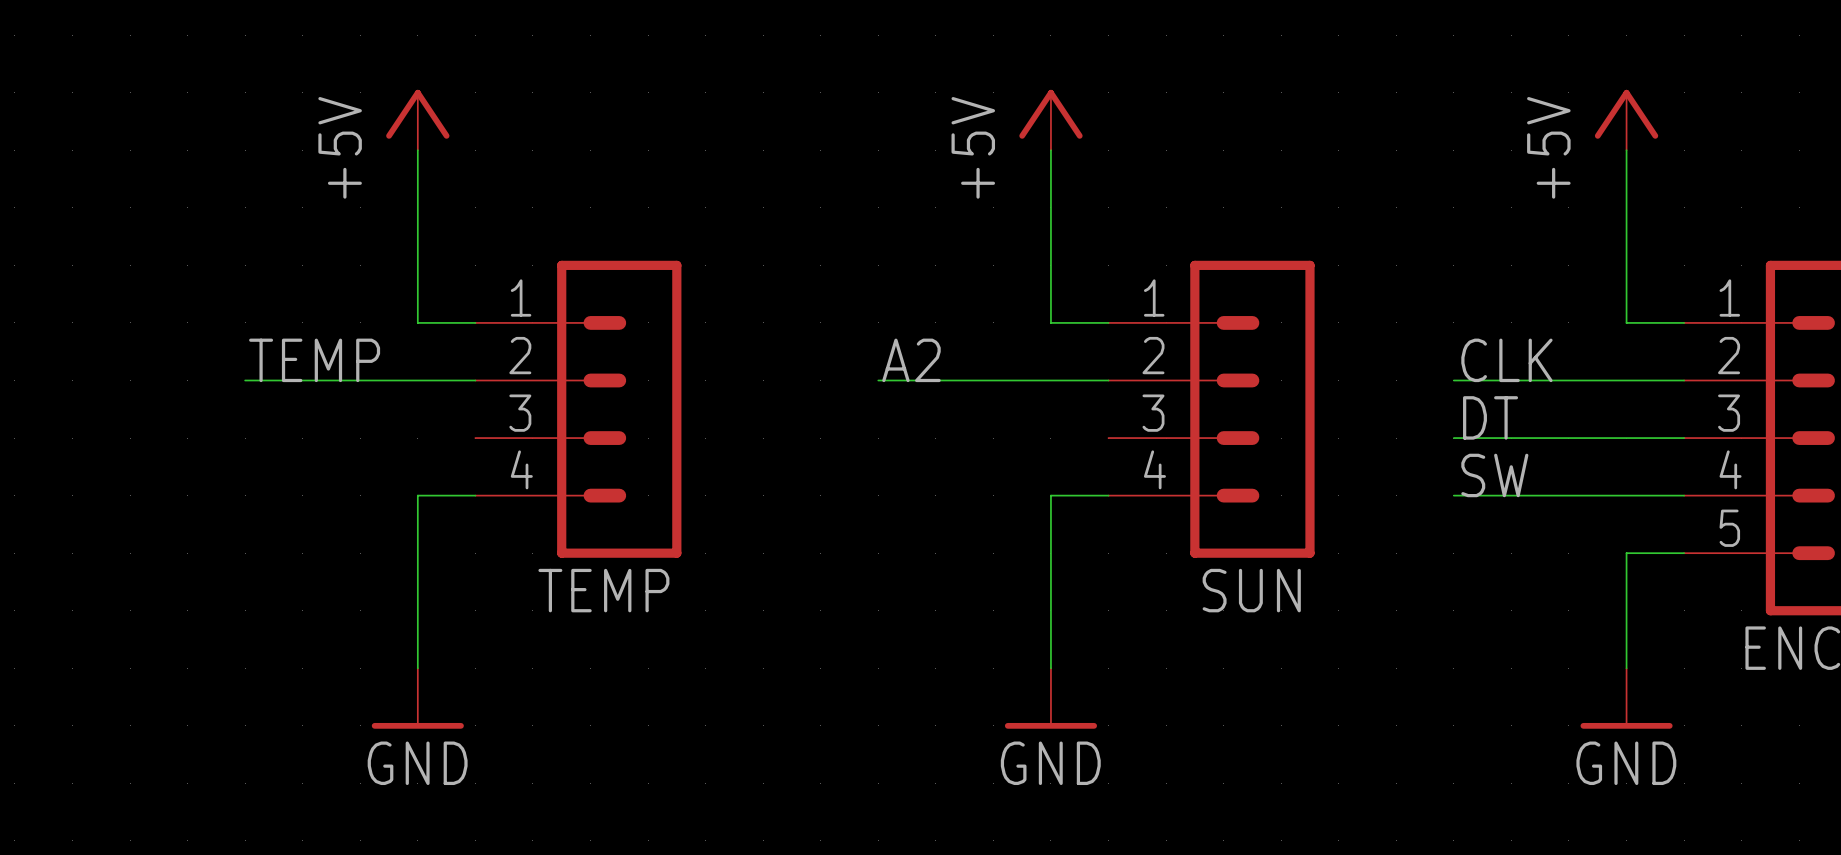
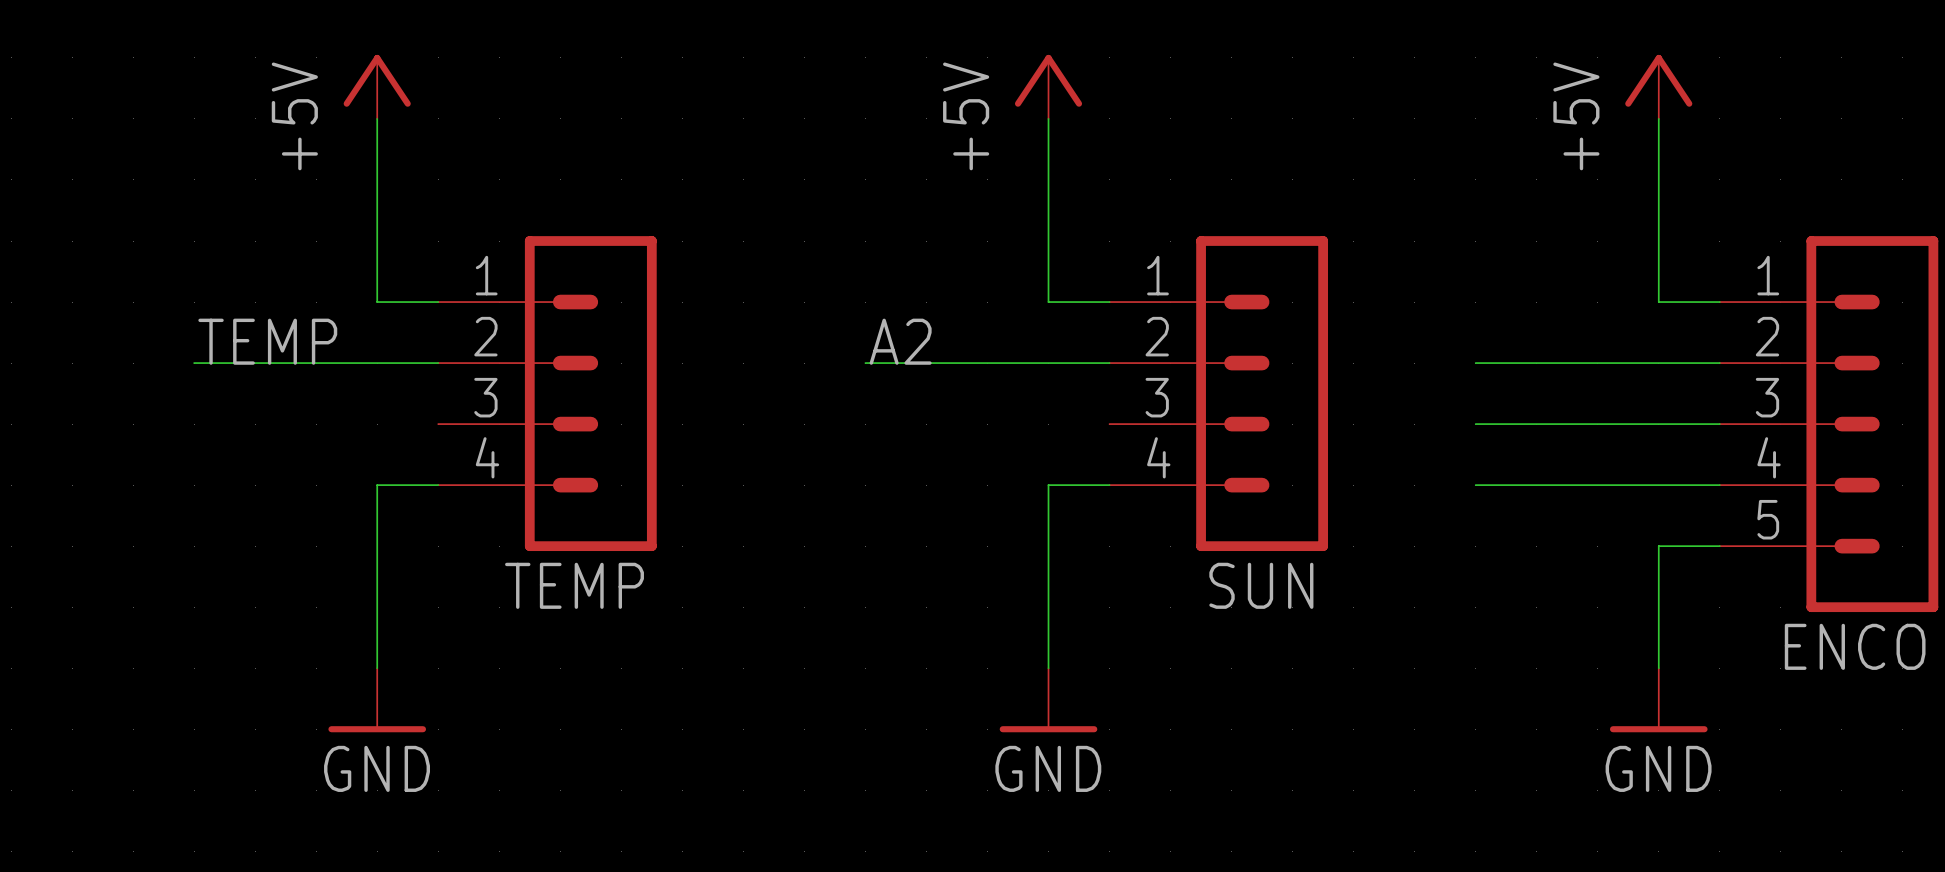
label: CLK (1506, 360) -> none
label: DT (1490, 417) -> none
label: SW (1494, 475) -> none

